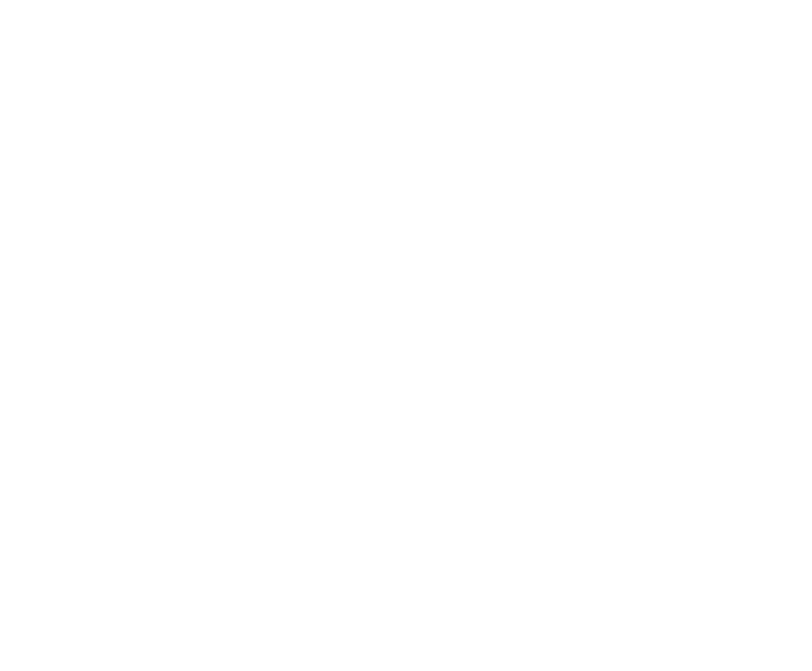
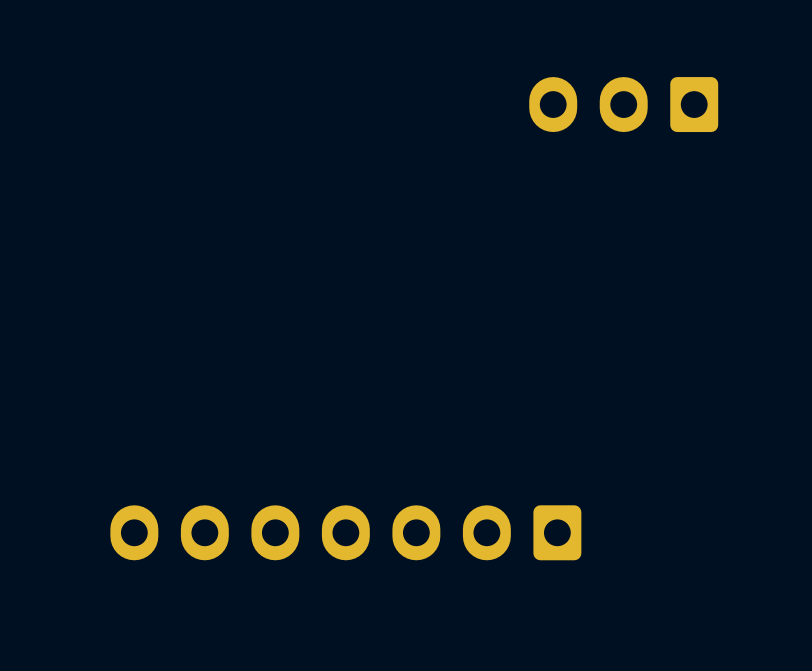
part: none -> (623, 104)
part: none -> (345, 532)

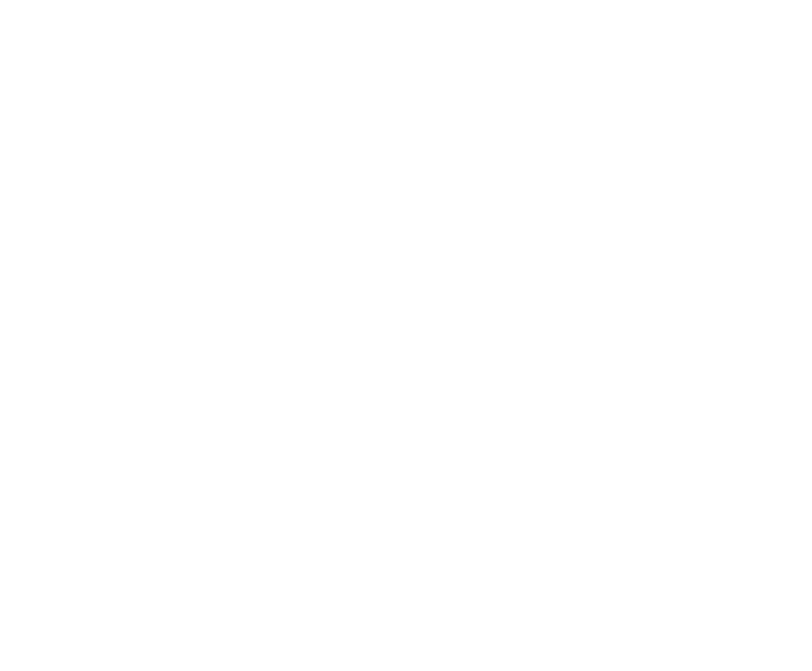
part: (623, 104) -> none
part: (345, 532) -> none

